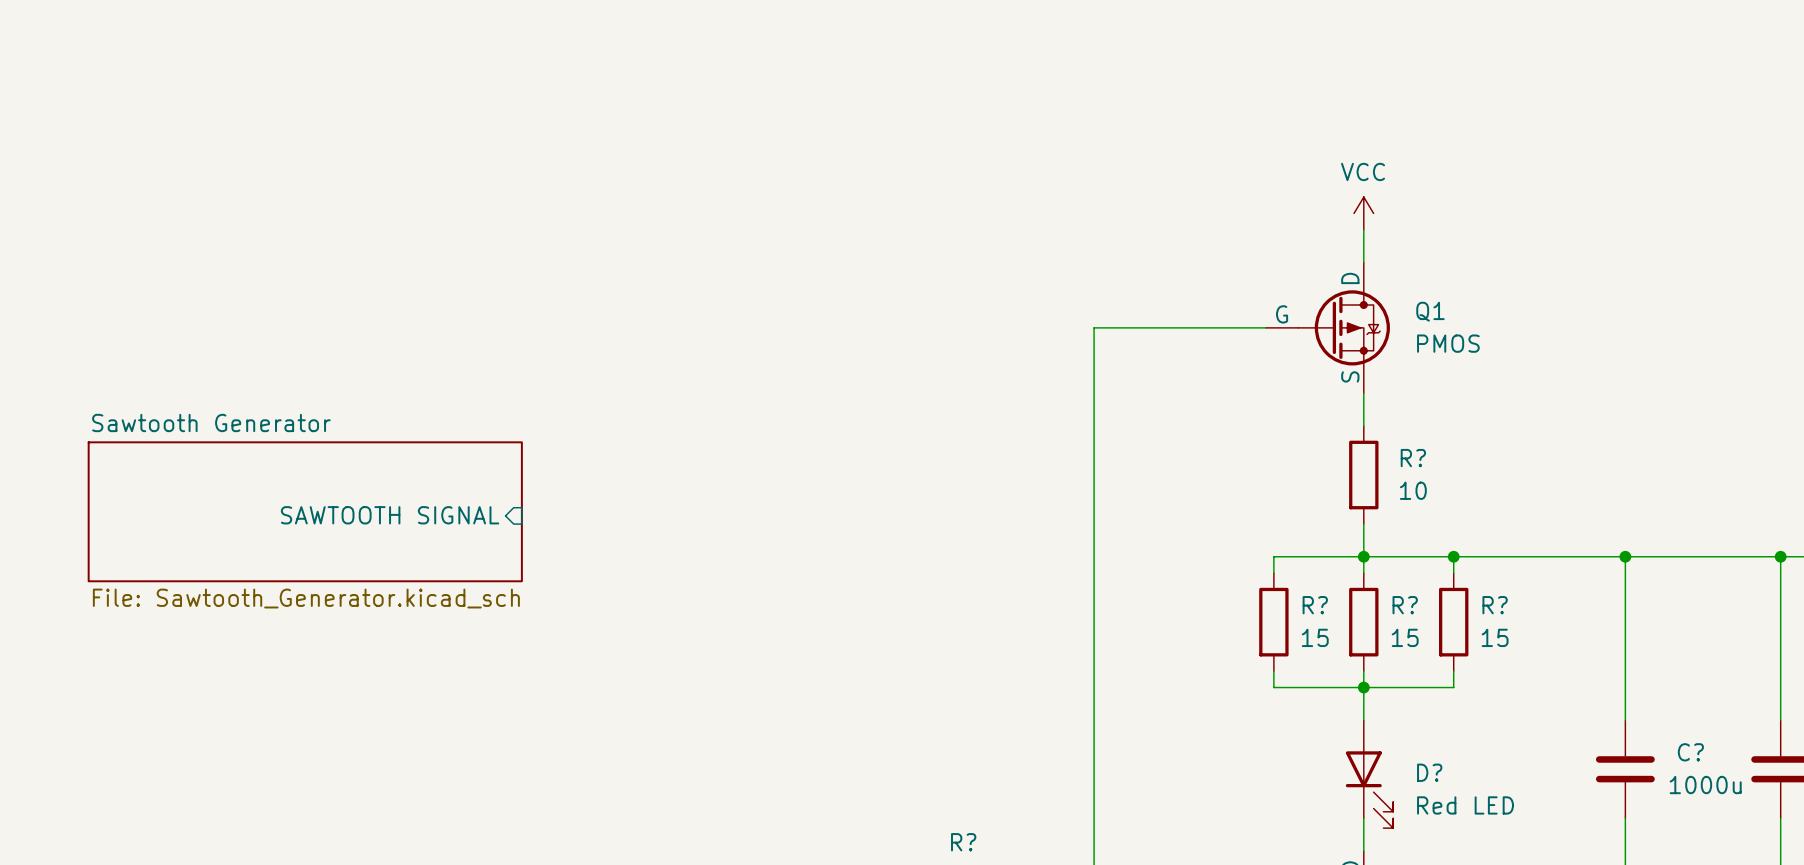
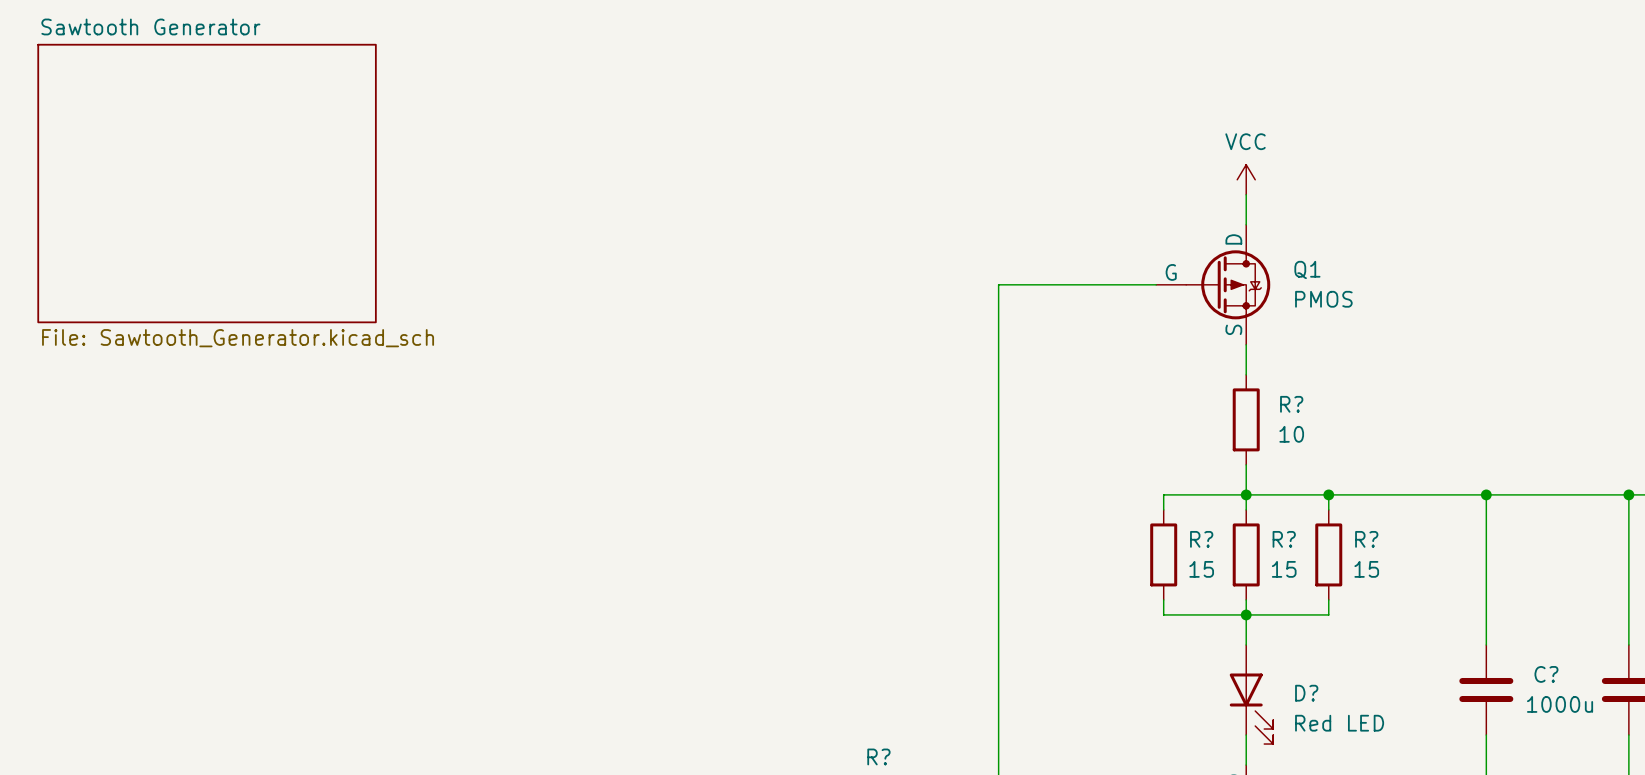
sheet Sawtooth Generator: none -> File: Sawtooth_Generator.kicad_sch (207, 183)
sheet Sawtooth Generator: File: Sawtooth_Generator.kicad_sch (305, 511) -> none
sheet pin: SAWTOOTH SIGNAL (390, 515) -> none

